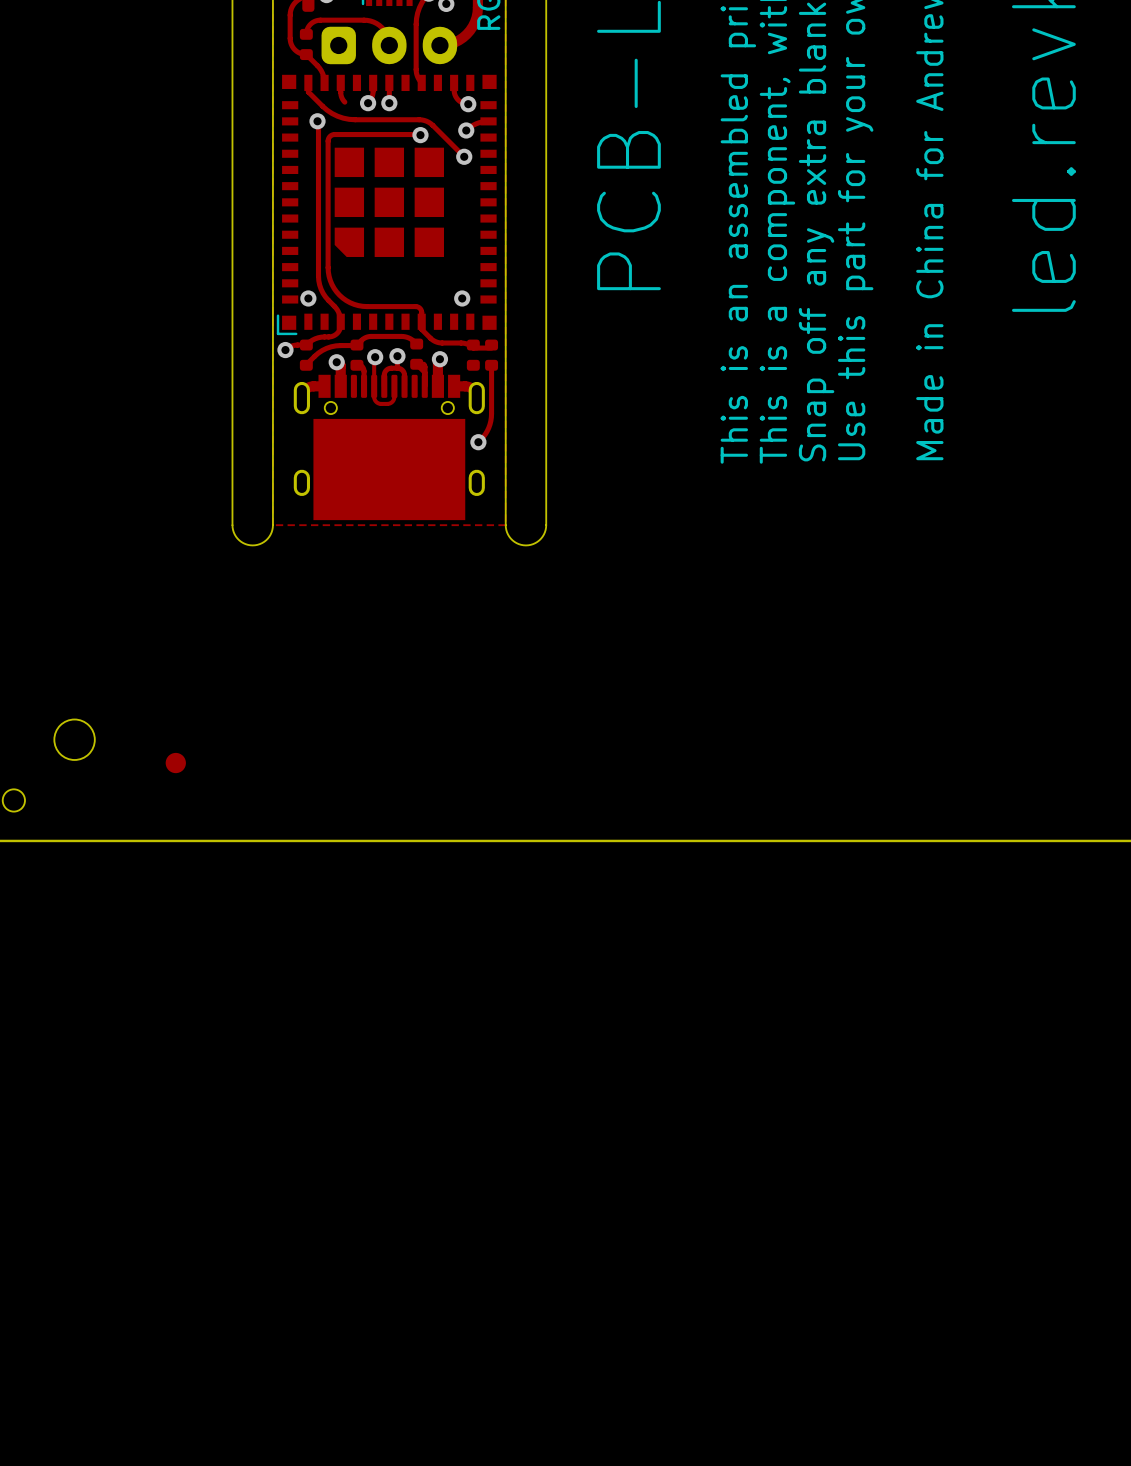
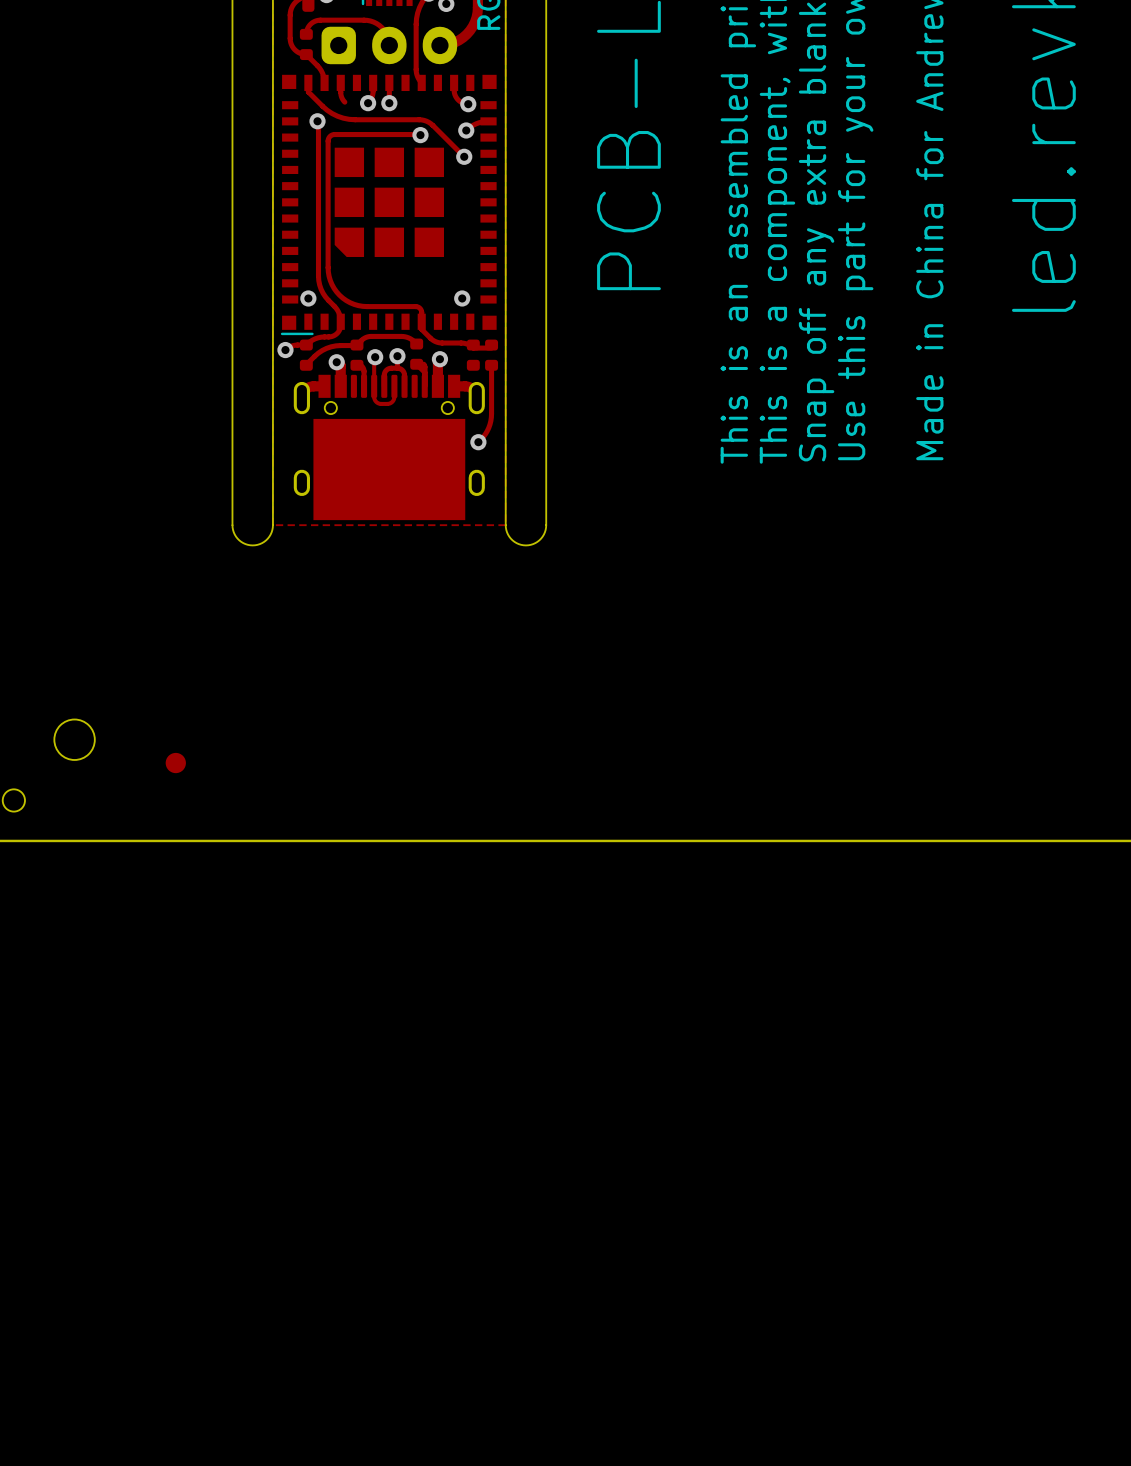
part footprint: [276, 74, 497, 336] -> [280, 74, 497, 336]

